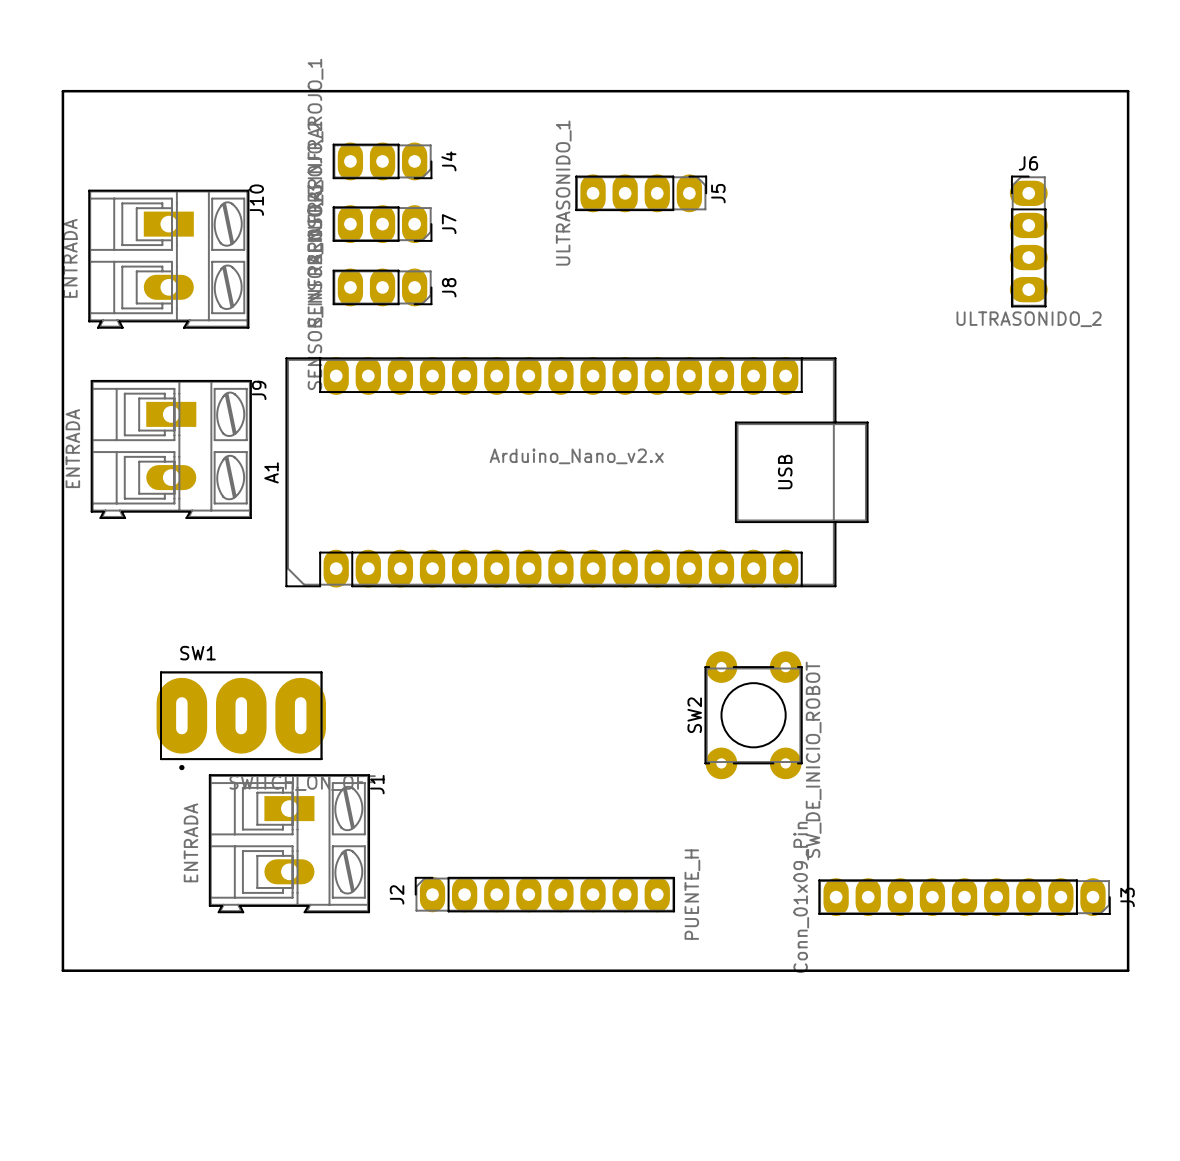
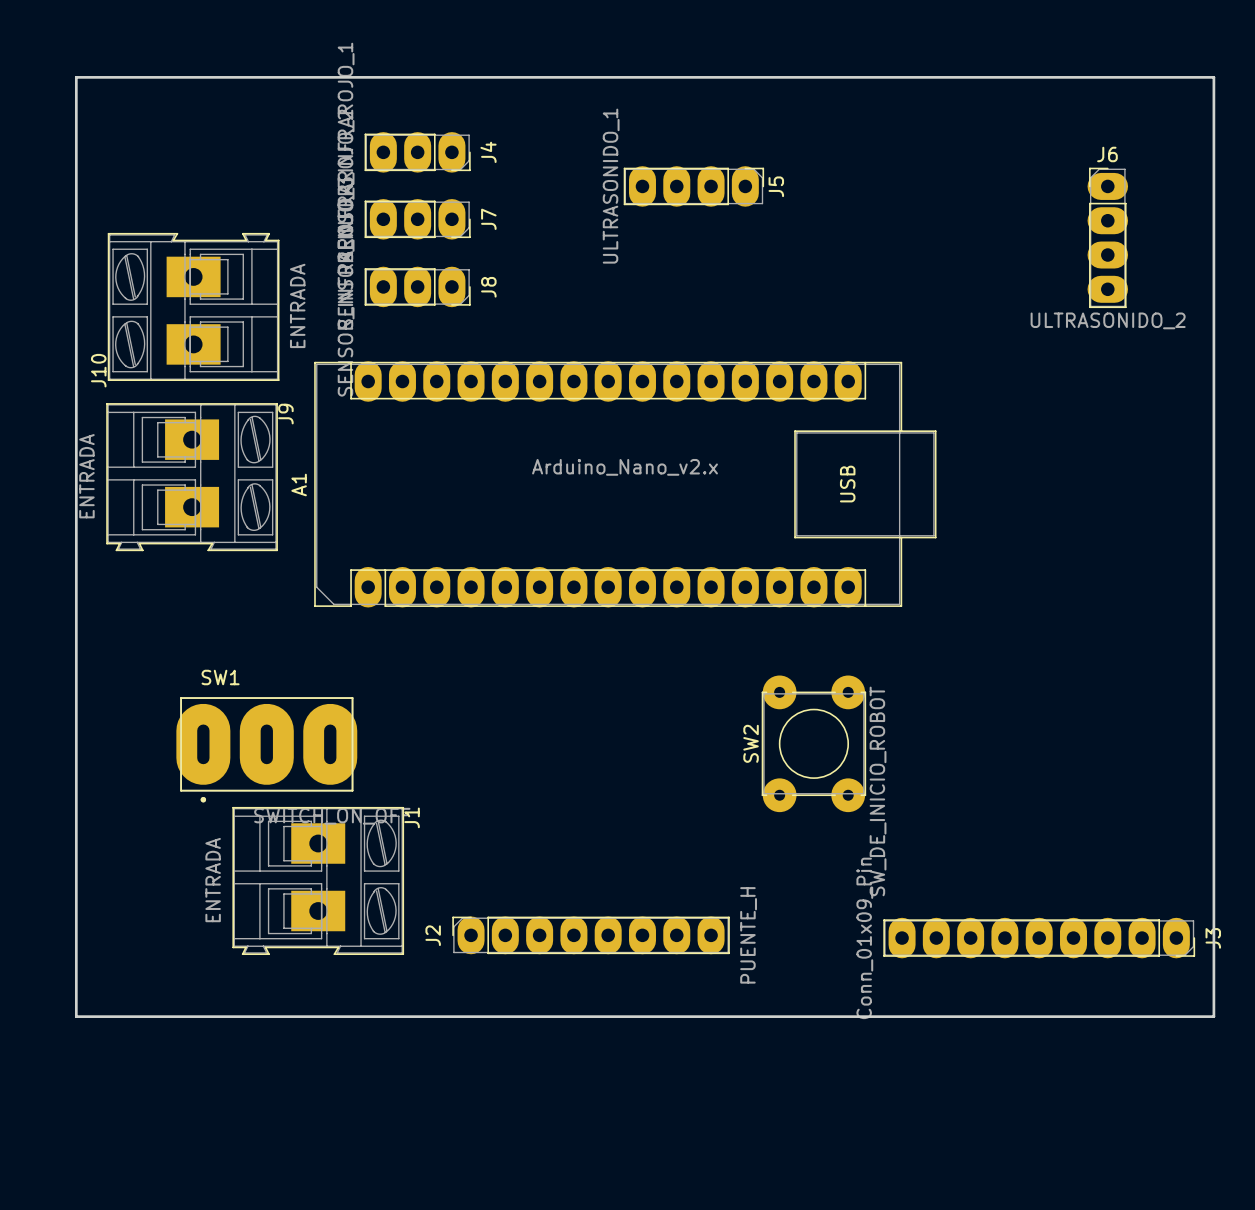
J10 footprint: [88, 189, 250, 329] -> [107, 232, 280, 382]
J10 name position: J10 (256, 200) -> J10 (98, 370)
J10 value position: ENTRADA (70, 258) -> ENTRADA (297, 305)
J9 footprint: [90, 380, 252, 519] -> [106, 403, 278, 552]
J1 footprint: [209, 774, 370, 914] -> [232, 806, 405, 956]

